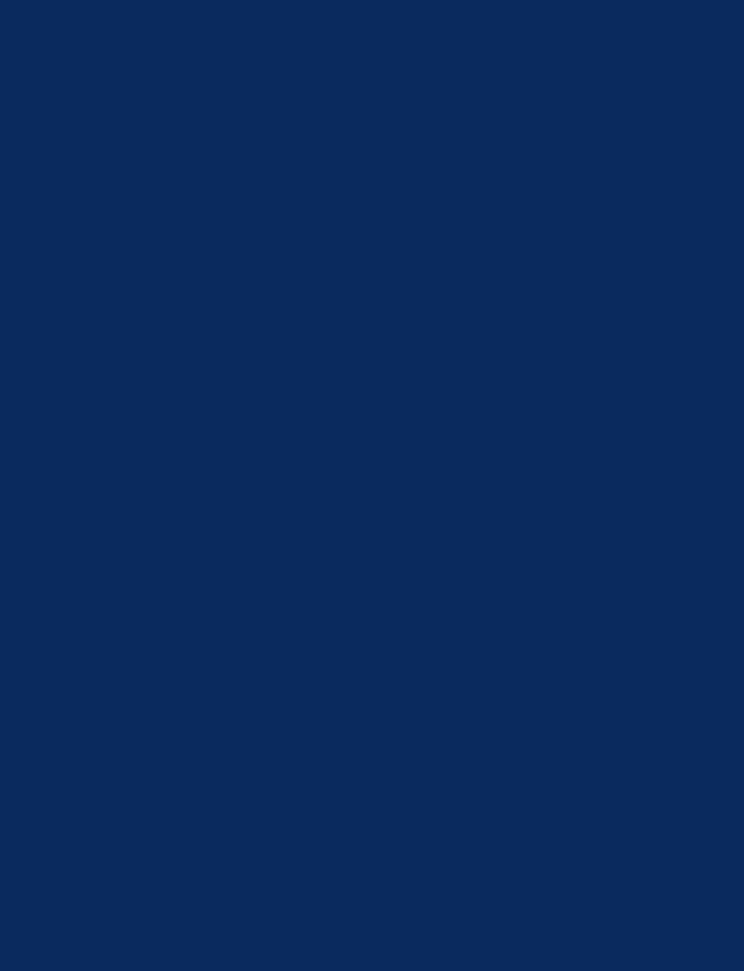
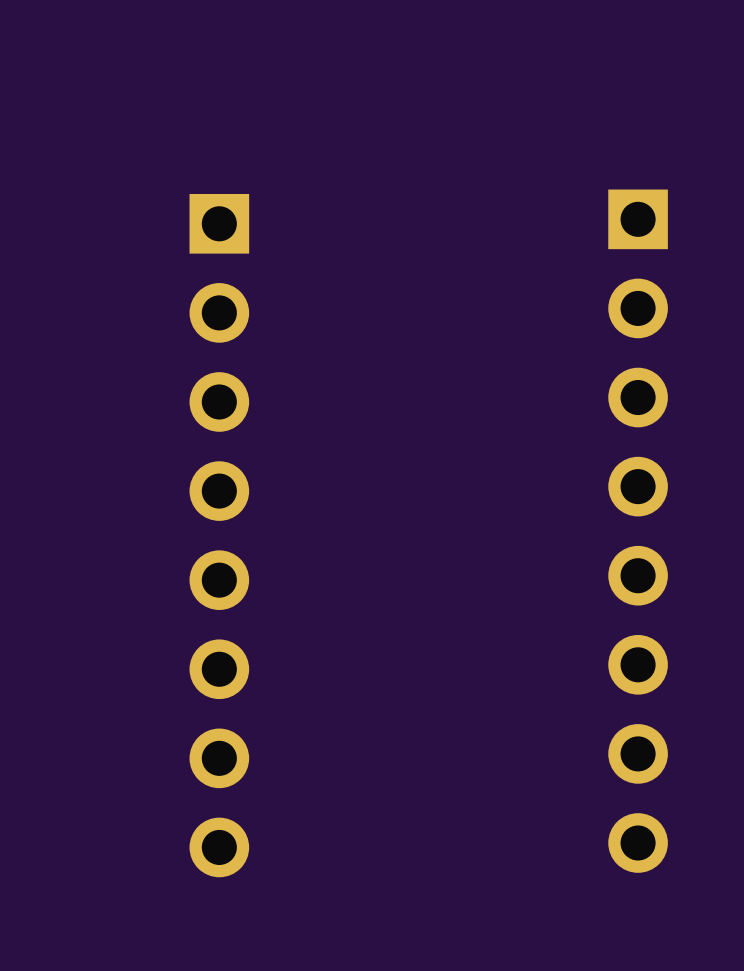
part: none -> (638, 531)
part: none -> (219, 535)

